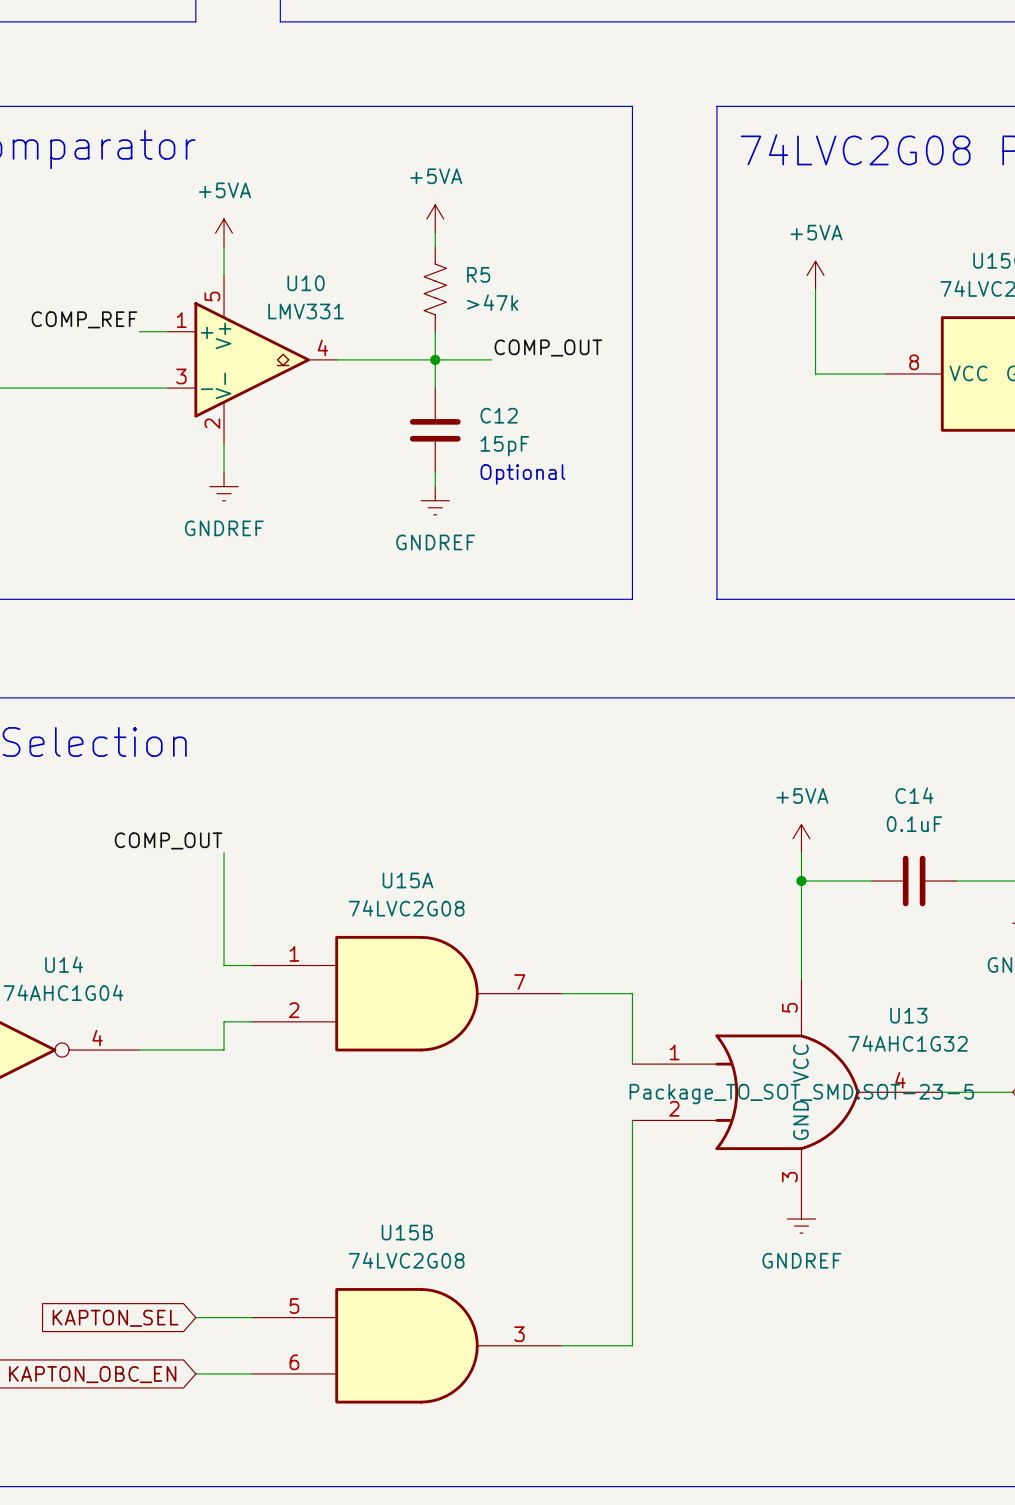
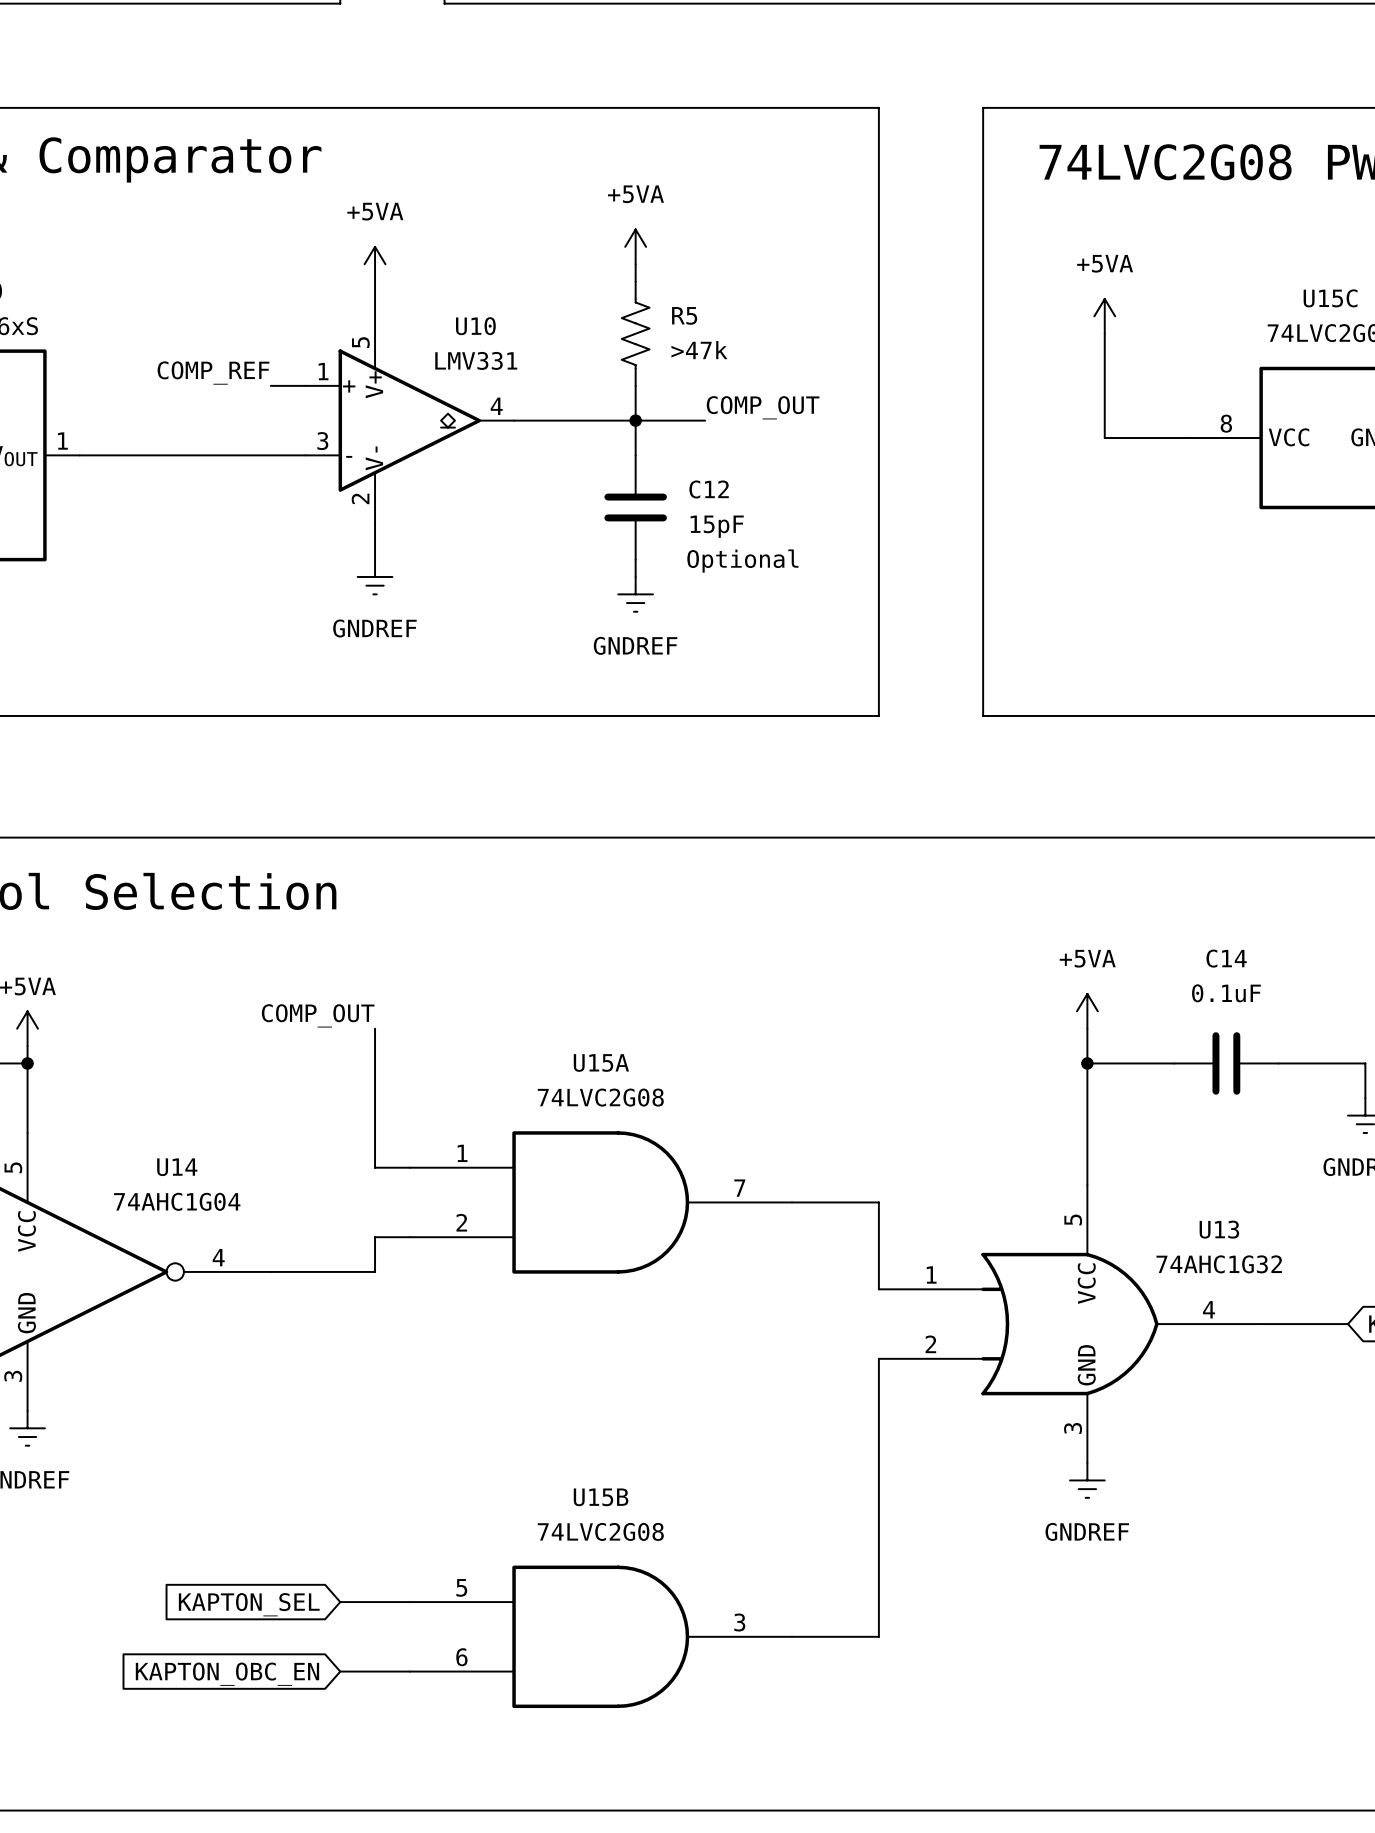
U13 text: Package_TO_SOT_SMD:SOT-23-5 (801, 1094) -> none

